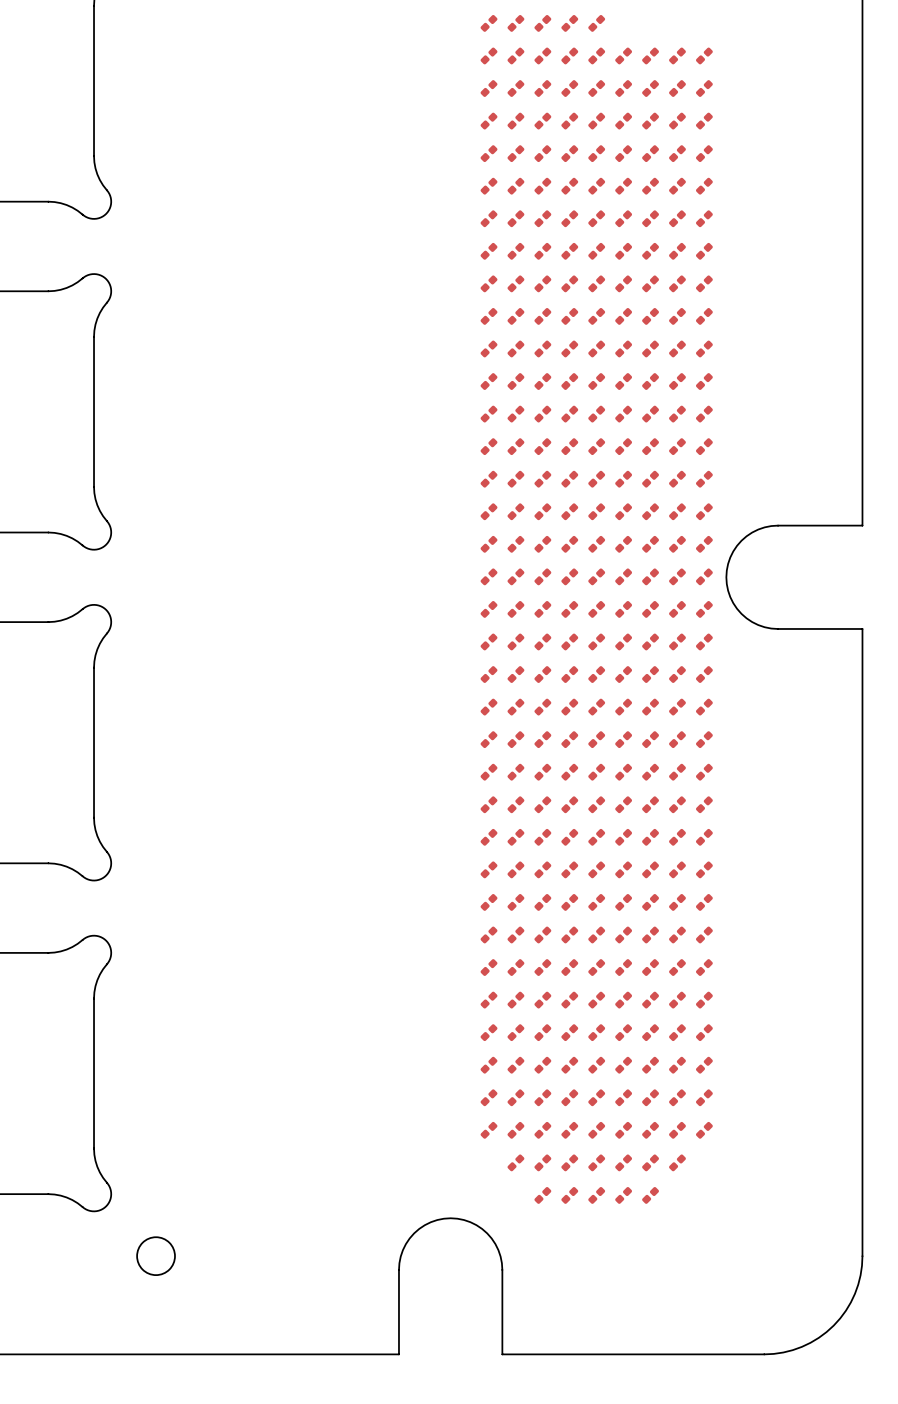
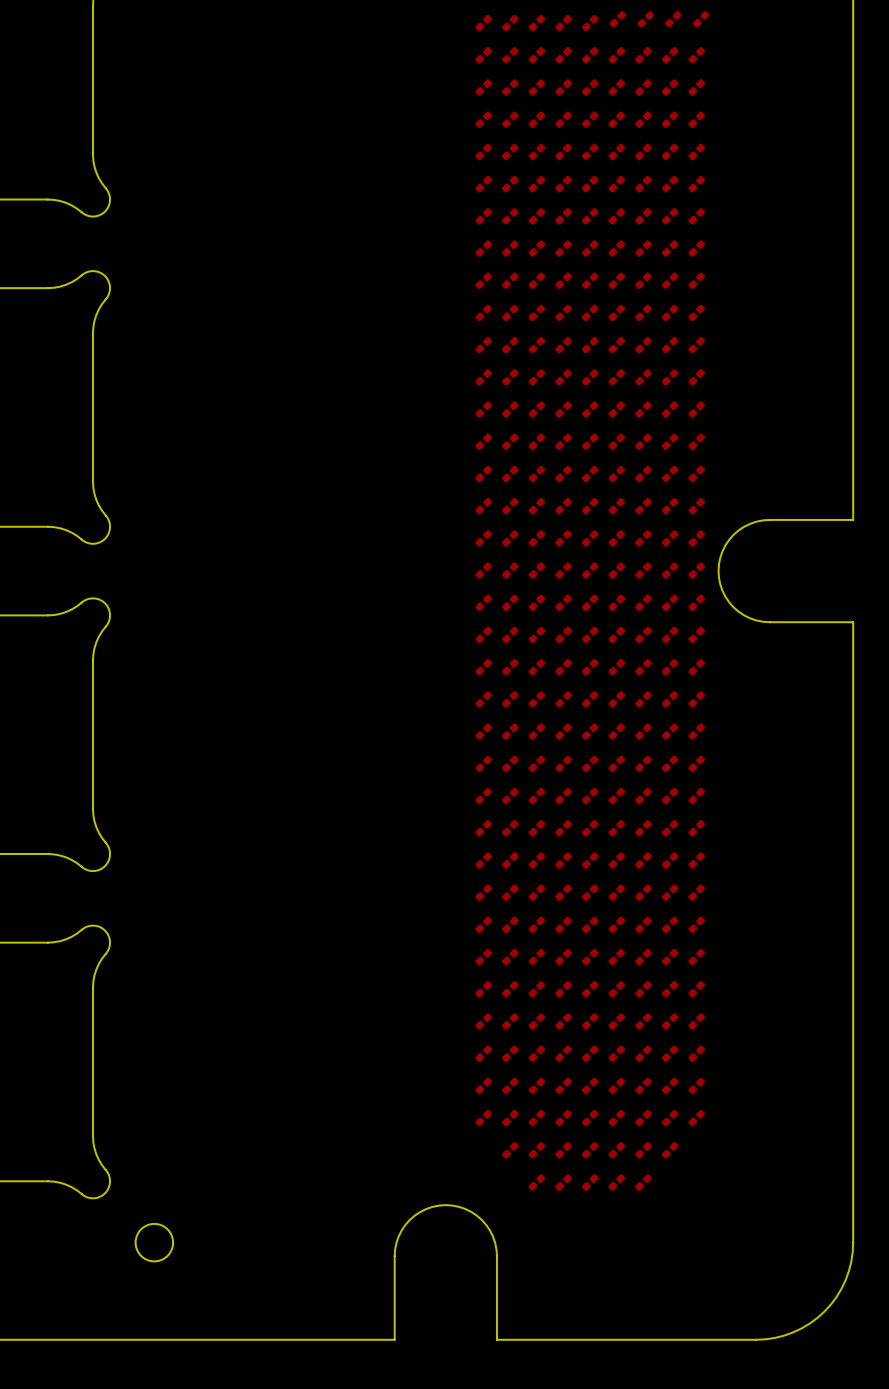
part: none -> (617, 19)
part: none -> (645, 19)
part: none -> (673, 19)
part: none -> (701, 19)

